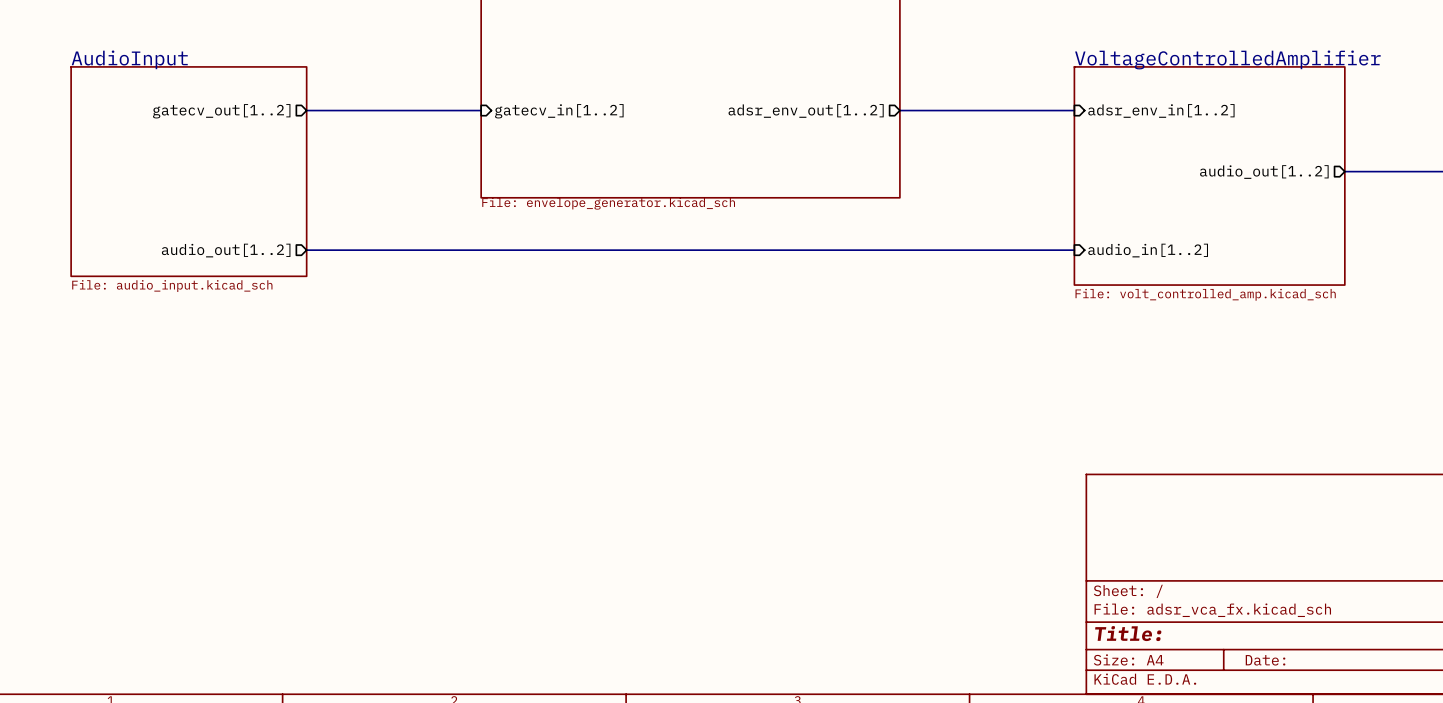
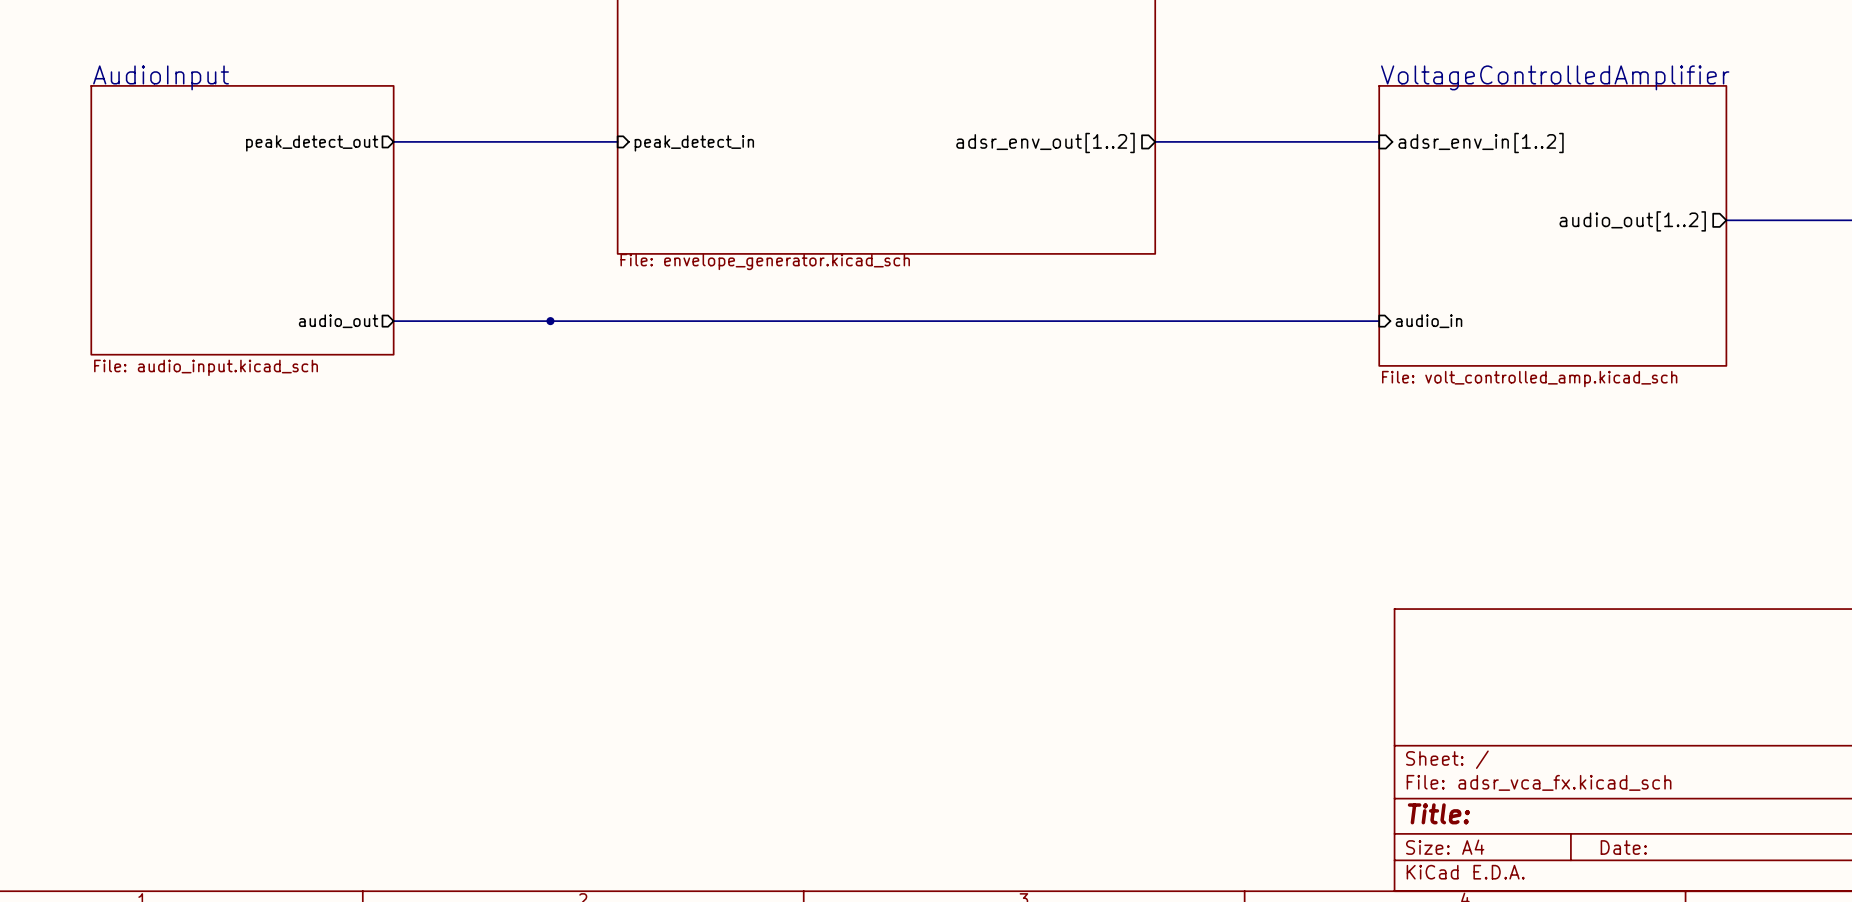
sheet pin: gatecv_out[1..2] (221, 111) -> peak_detect_out (312, 143)
sheet pin: gatecv_in[1..2] (559, 111) -> peak_detect_in (694, 143)
sheet pin: audio_out[1..2] (226, 250) -> audio_out (338, 321)
bus: (306, 250) (1074, 250) -> none
junction: none -> (550, 321)
sheet pin: audio_in[1..2] (1148, 250) -> audio_in (1428, 321)

